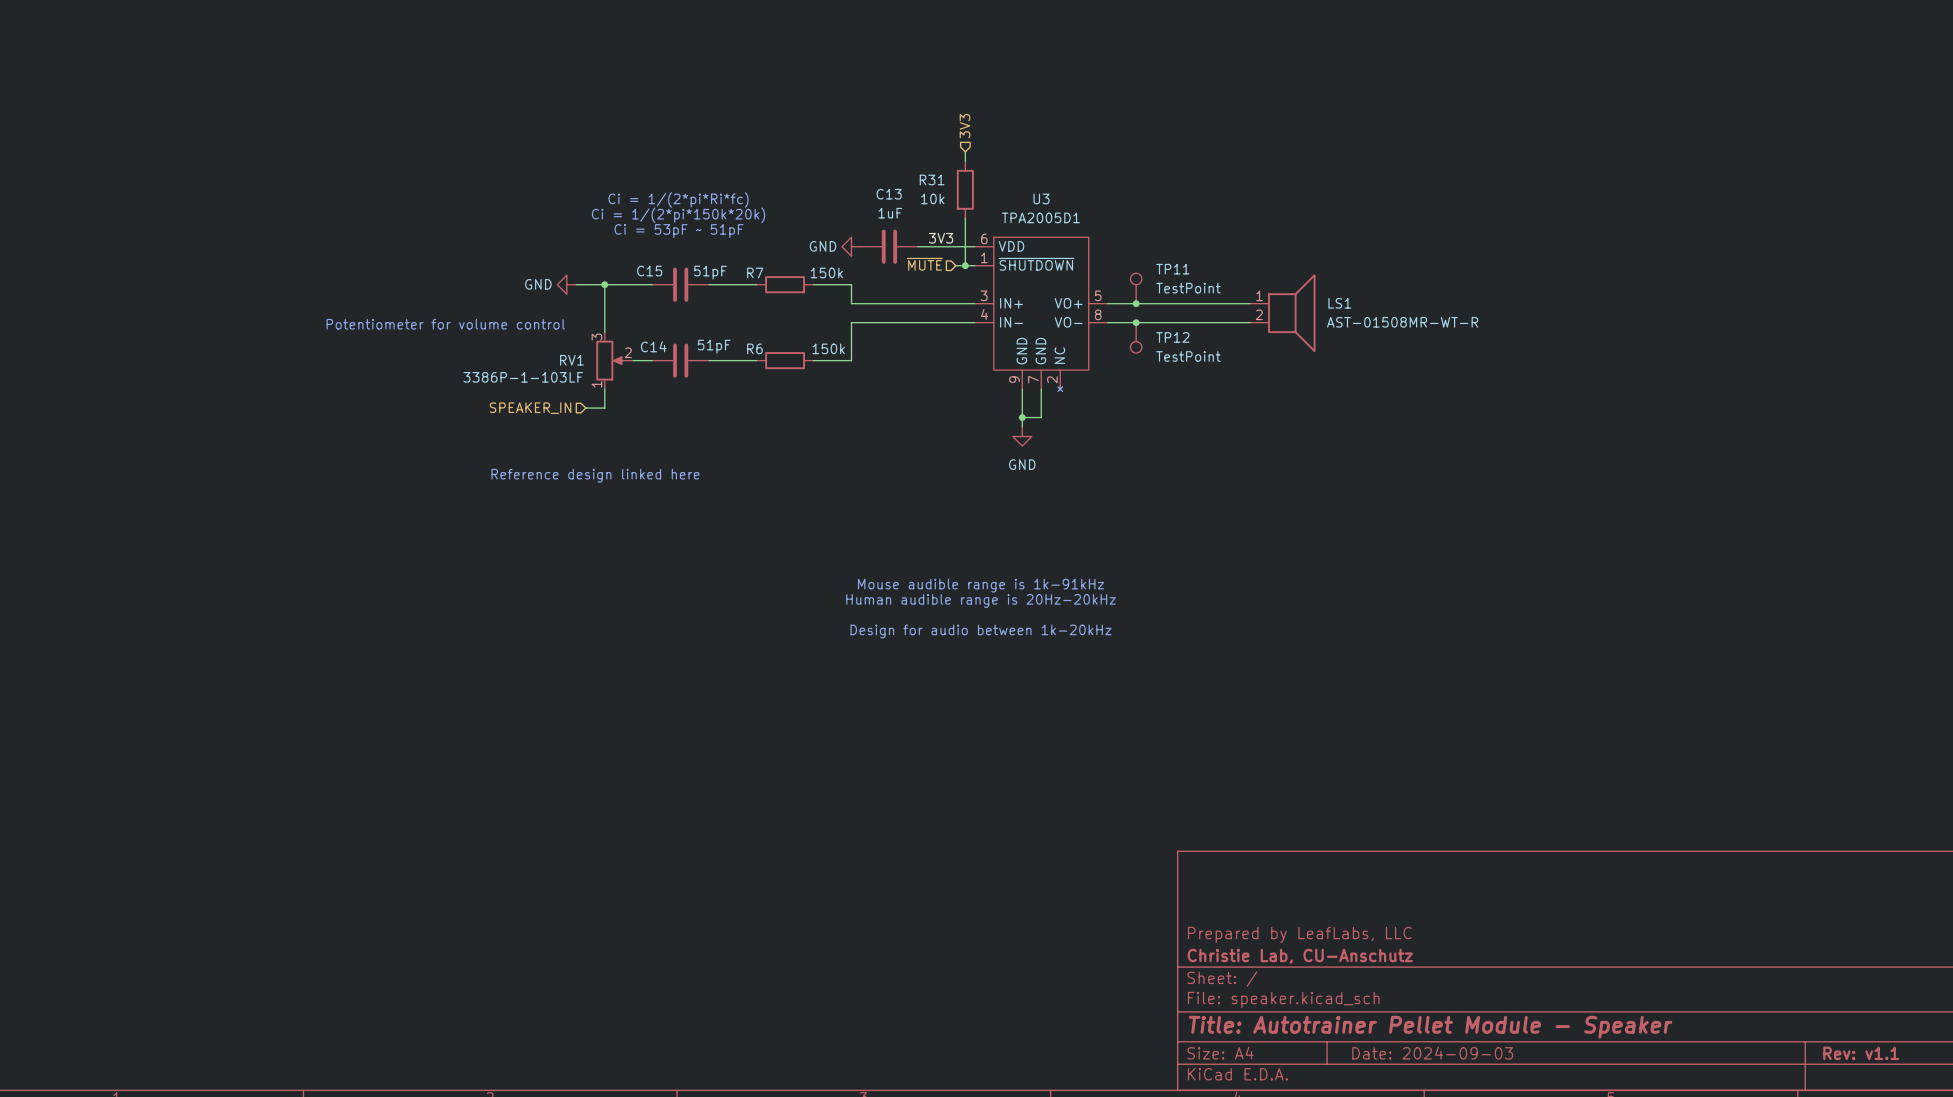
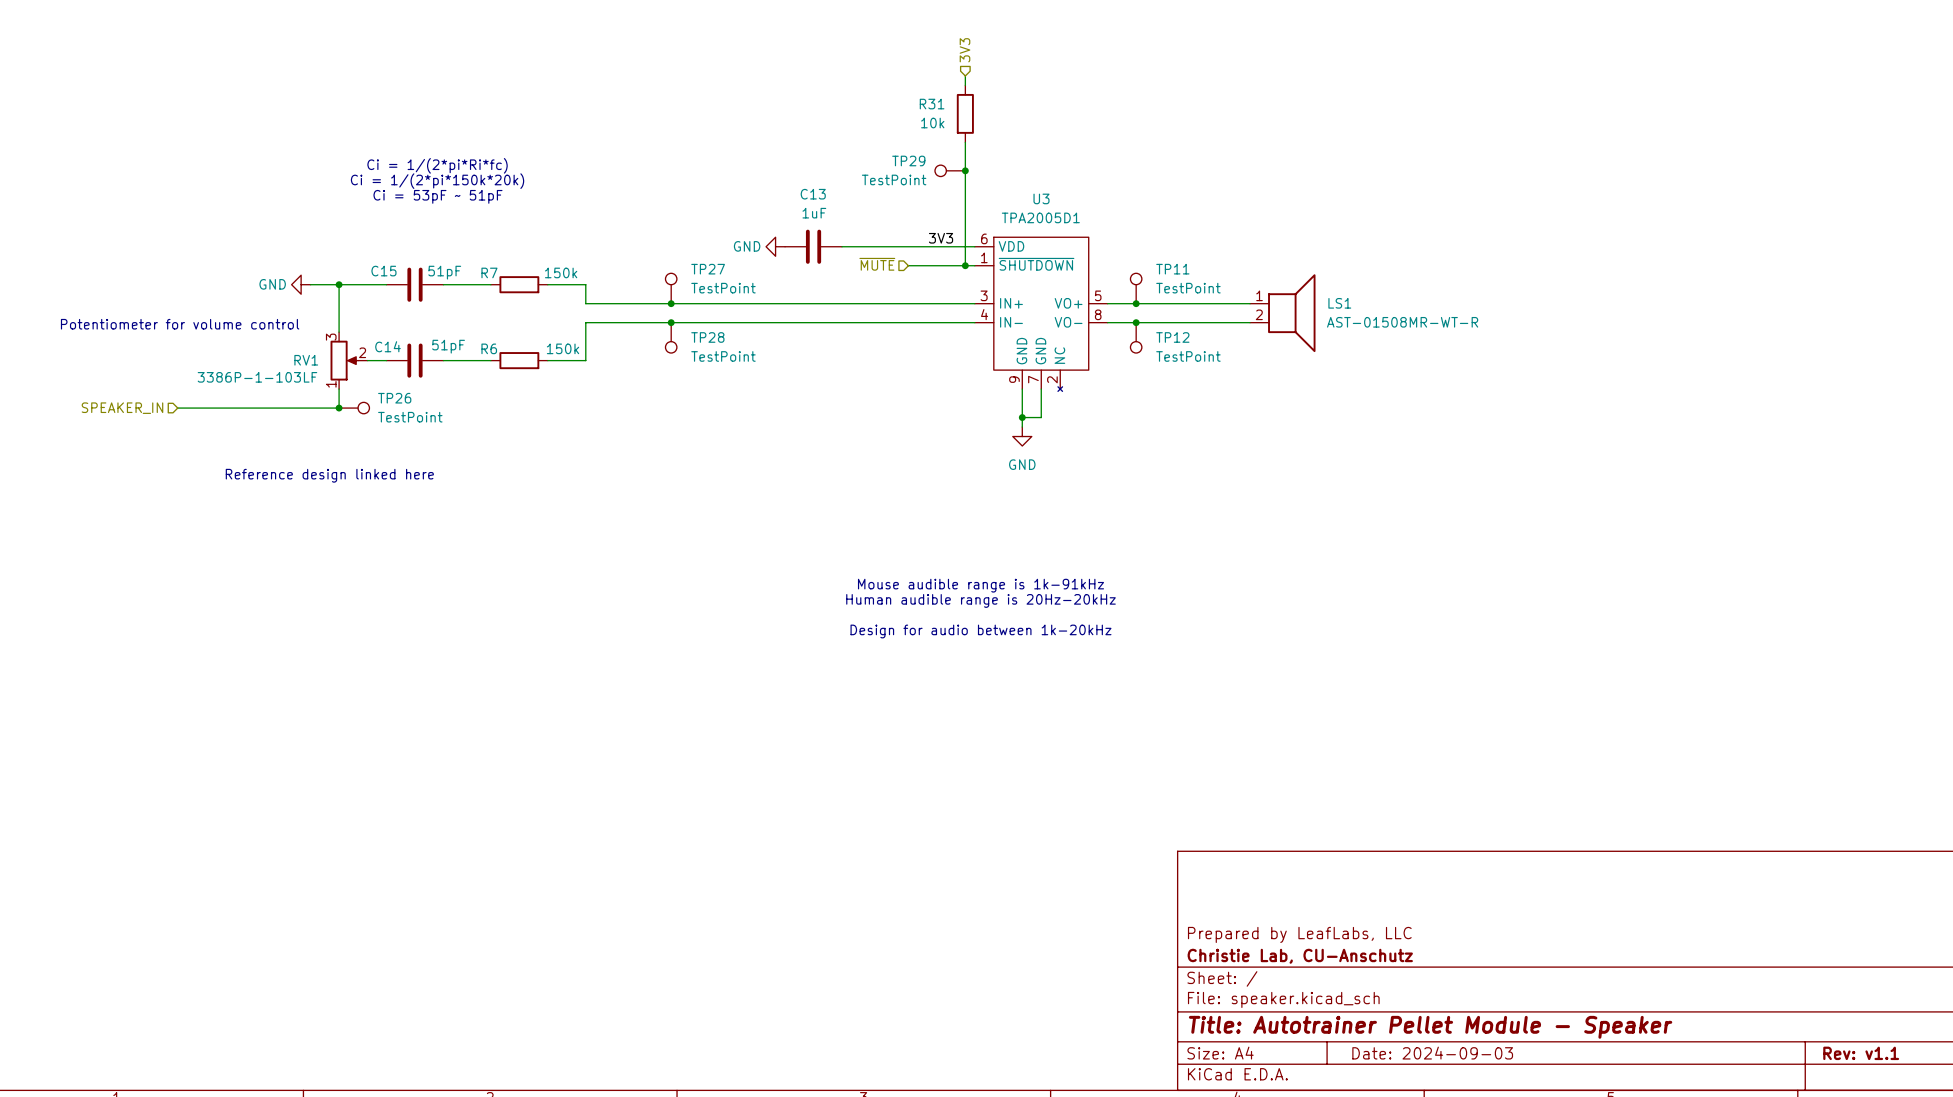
wire: none -> (965, 75) (965, 85)
hierarchical label position: 3V3 (965, 126) -> 3V3 (965, 50)
wire: none -> (965, 142) (965, 151)
wire: none -> (965, 161) (965, 218)
text: none -> Ci = 1/(2*pi*Ri*fc) (437, 165)
TP29: none -> TestPoint (950, 170)
junction: none -> (965, 170)
text: none -> Ci = 1/(2*pi*150k*20k) (437, 181)
R31 position: (965, 189) -> (965, 113)
text: none -> Ci = 53pF ~ 51pF (437, 196)
text: Ci = 1/(2*pi*Ri*fc) (678, 200) -> none
text: Ci = 1/(2*pi*150k*20k) (678, 215) -> none
text: Ci = 53pF ~ 51pF (679, 231) -> none
power symbol position: GND (851, 246) -> GND (775, 246)
C13 position: (889, 246) -> (813, 246)
hierarchical label position: ~{MUTE} (924, 264) -> ~{MUTE} (877, 264)
wire: none -> (908, 265) (955, 265)
power symbol: none -> GND (301, 284)
wire: none -> (310, 284) (386, 284)
wire: none -> (339, 284) (339, 332)
junction: none -> (339, 284)
wire: none -> (443, 284) (490, 284)
wire: none -> (547, 284) (576, 284)
power symbol: GND (566, 284) -> none
wire: (585, 284) (652, 284) -> (585, 284) (585, 303) (851, 303)
wire: (604, 284) (604, 332) -> none
junction: (604, 284) -> none
C15 position: (680, 284) -> (414, 284)
wire: (709, 284) (756, 284) -> none
R7 position: (785, 284) -> (519, 284)
wire: (813, 284) (851, 284) (851, 303) -> none
TP27: none -> TestPoint (671, 288)
junction: none -> (671, 303)
junction: none -> (671, 322)
wire: (851, 322) (851, 360) (813, 360) -> (851, 322) (585, 322) (585, 360) (547, 360)
text: none -> Potentiometer for volume control (180, 324)
text: Potentiometer for volume control (445, 324) -> none
TP28: none -> TestPoint (671, 337)
wire: none -> (367, 360) (386, 360)
wire: none -> (443, 360) (490, 360)
RV1 position: (614, 360) -> (349, 360)
wire: (633, 360) (652, 360) -> none
C14 position: (680, 360) -> (414, 360)
wire: (709, 360) (756, 360) -> none
R6 position: (785, 360) -> (519, 360)
wire: none -> (339, 389) (339, 408) (177, 408)
wire: (604, 389) (604, 408) (585, 408) -> none
hierarchical label: none -> SPEAKER_IN (122, 408)
junction: none -> (339, 408)
TP26: none -> TestPoint (354, 408)
hierarchical label: SPEAKER_IN (530, 408) -> none
text: none -> Reference design linked here (329, 475)
text: Reference design linked here (595, 475) -> none

